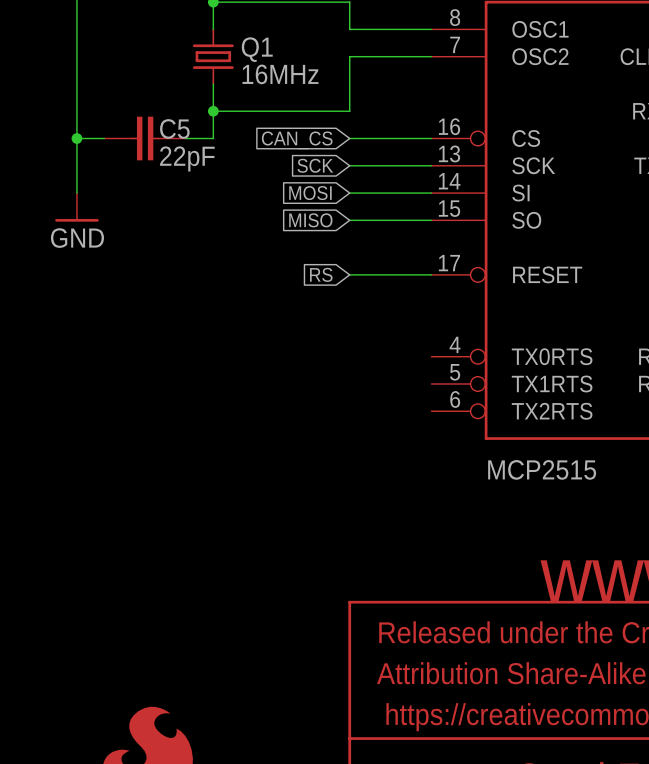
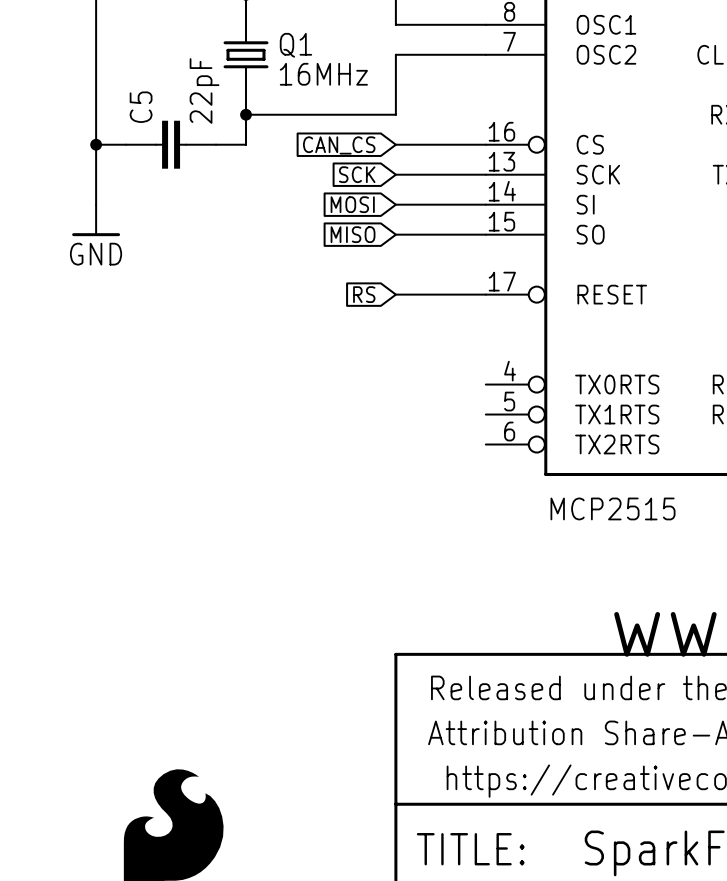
C5 name rotation: 0° (174, 128) -> 90° counterclockwise (141, 107)
C5 name position: C5 (174, 128) -> C5 (141, 107)
C5 value rotation: 0° (187, 158) -> 90° counterclockwise (204, 91)
C5 value position: 22pF (187, 158) -> 22pF (204, 91)

